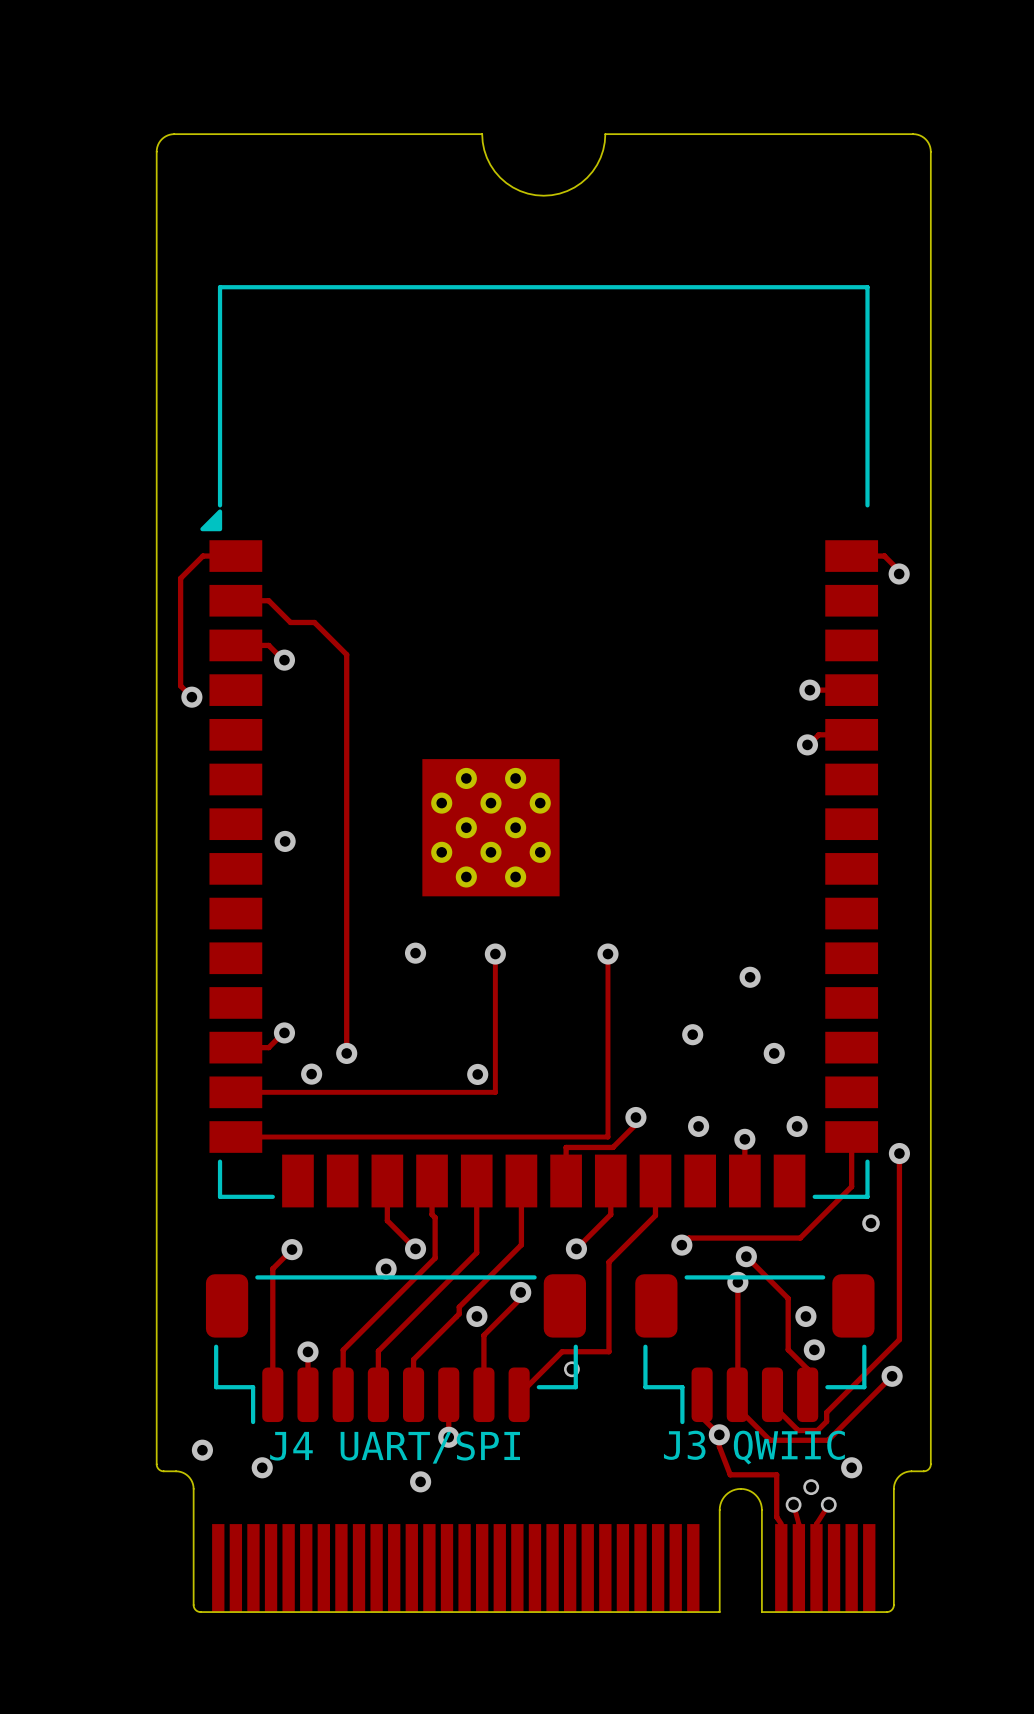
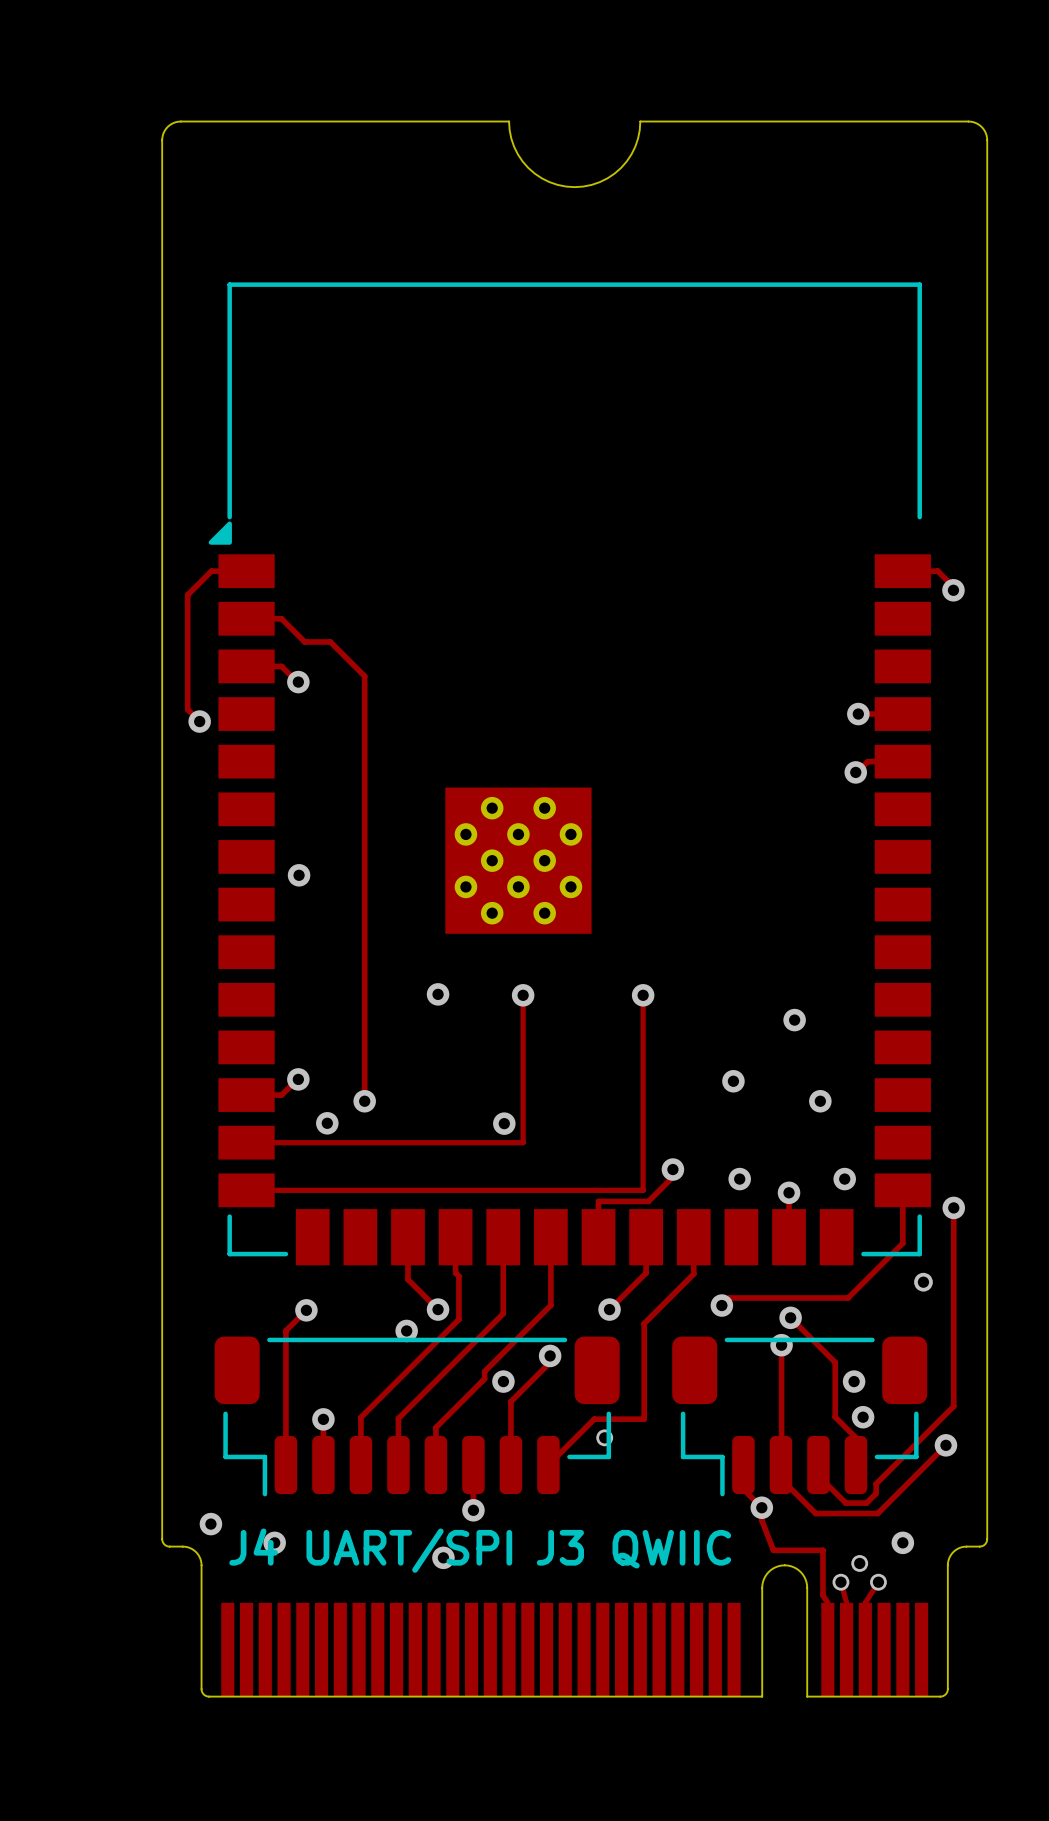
text position: J4 UART/SPI (395, 1447) -> J4 UART/SPI (370, 1550)
text position: J3 QWIIC (754, 1447) -> J3 QWIIC (633, 1549)

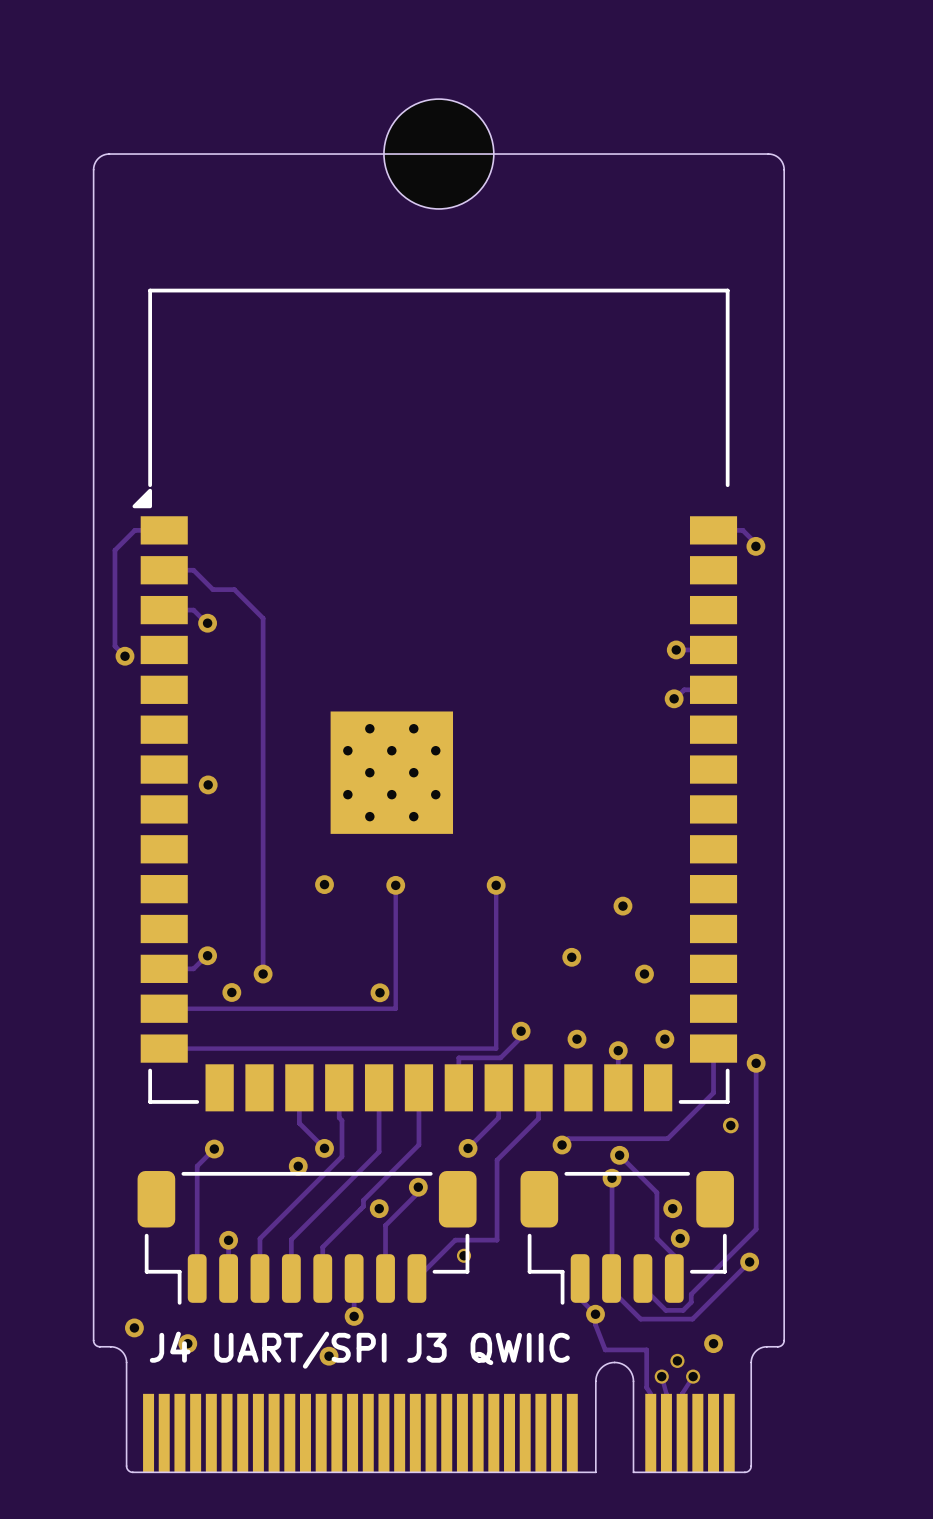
part footprint: [161, 120, 989, 1698] -> [92, 99, 785, 1474]

